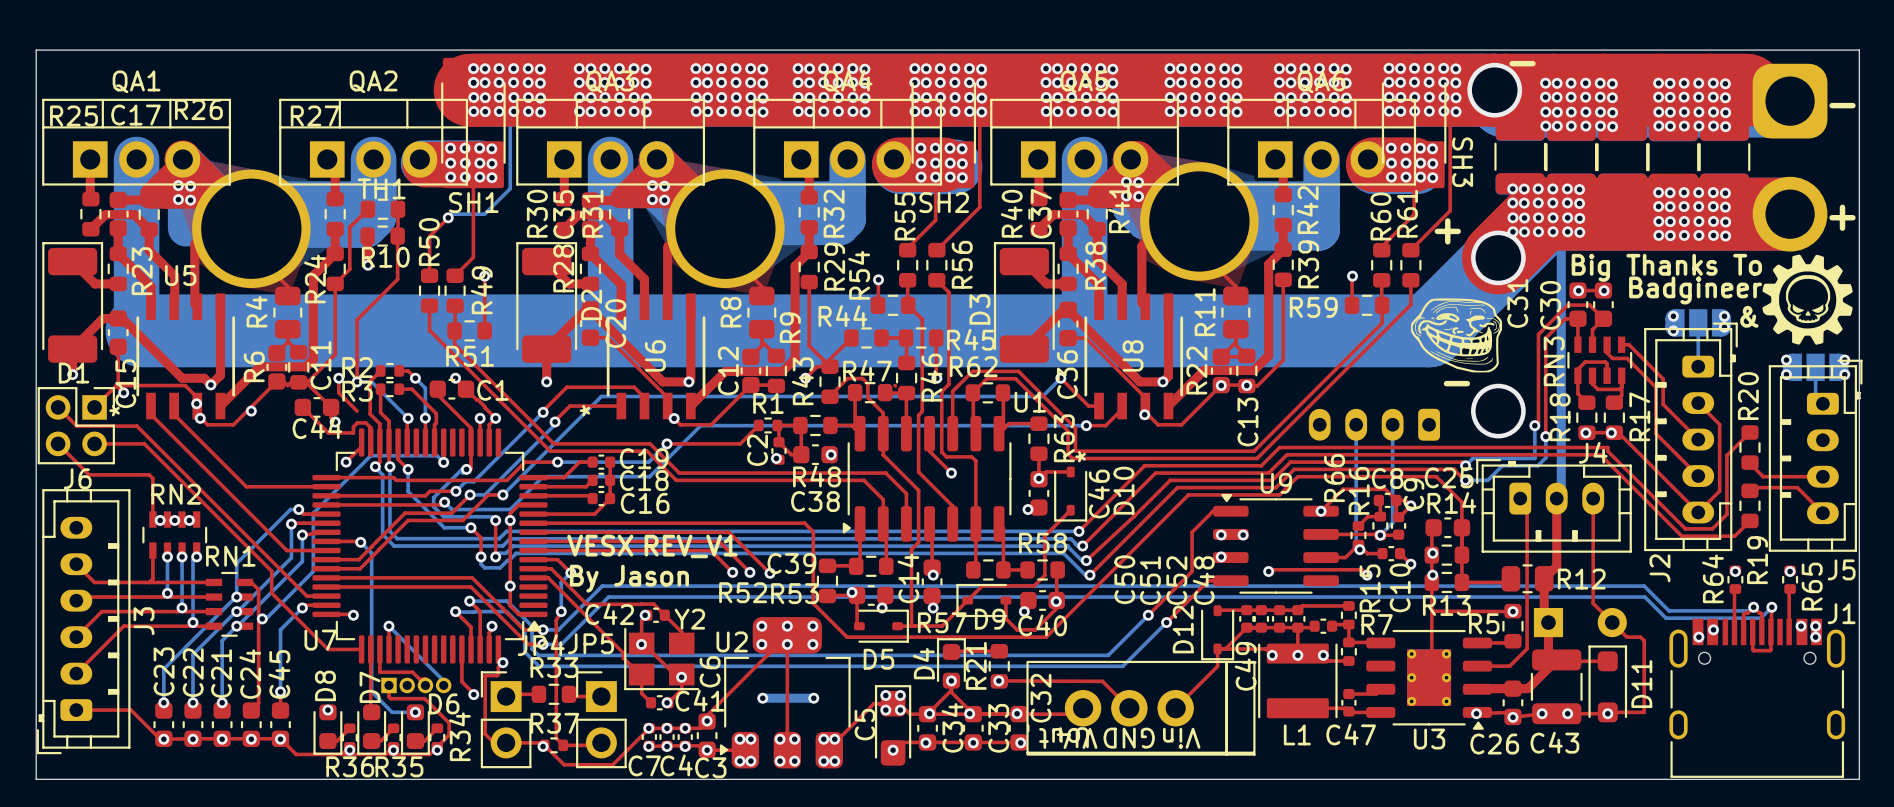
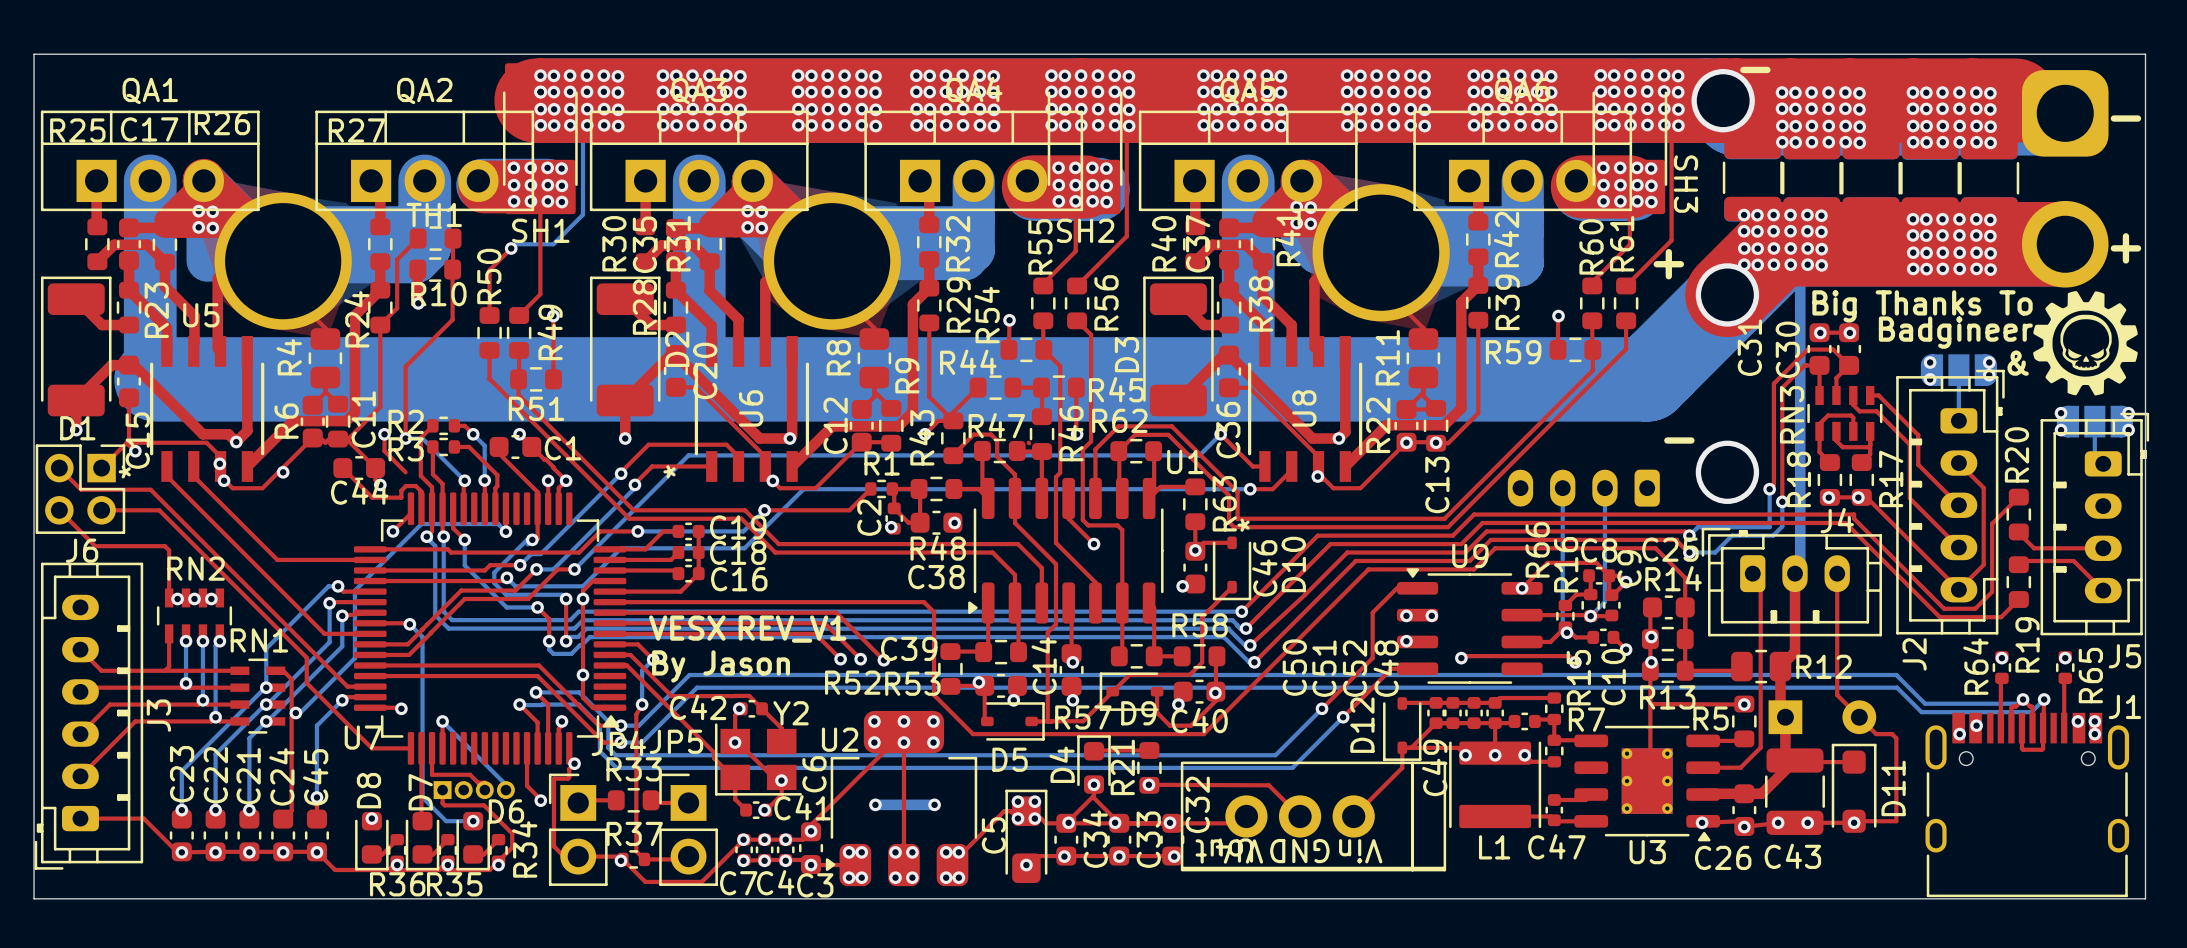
drawing: [1411, 298, 1503, 373] -> none

